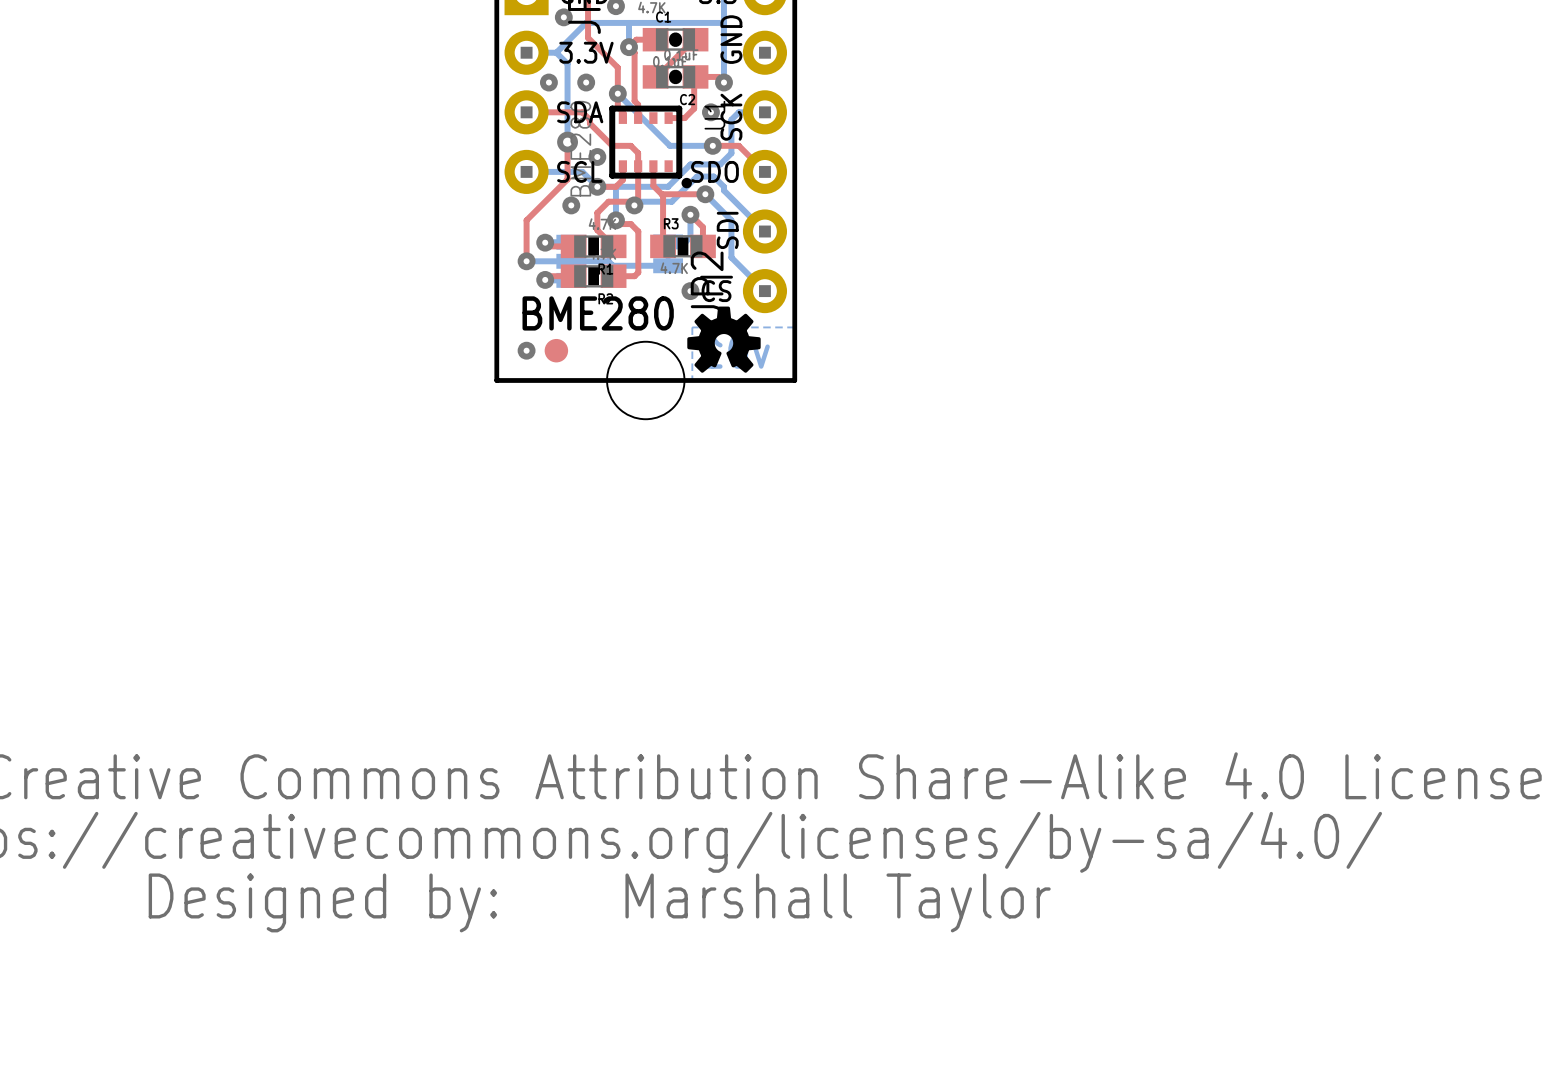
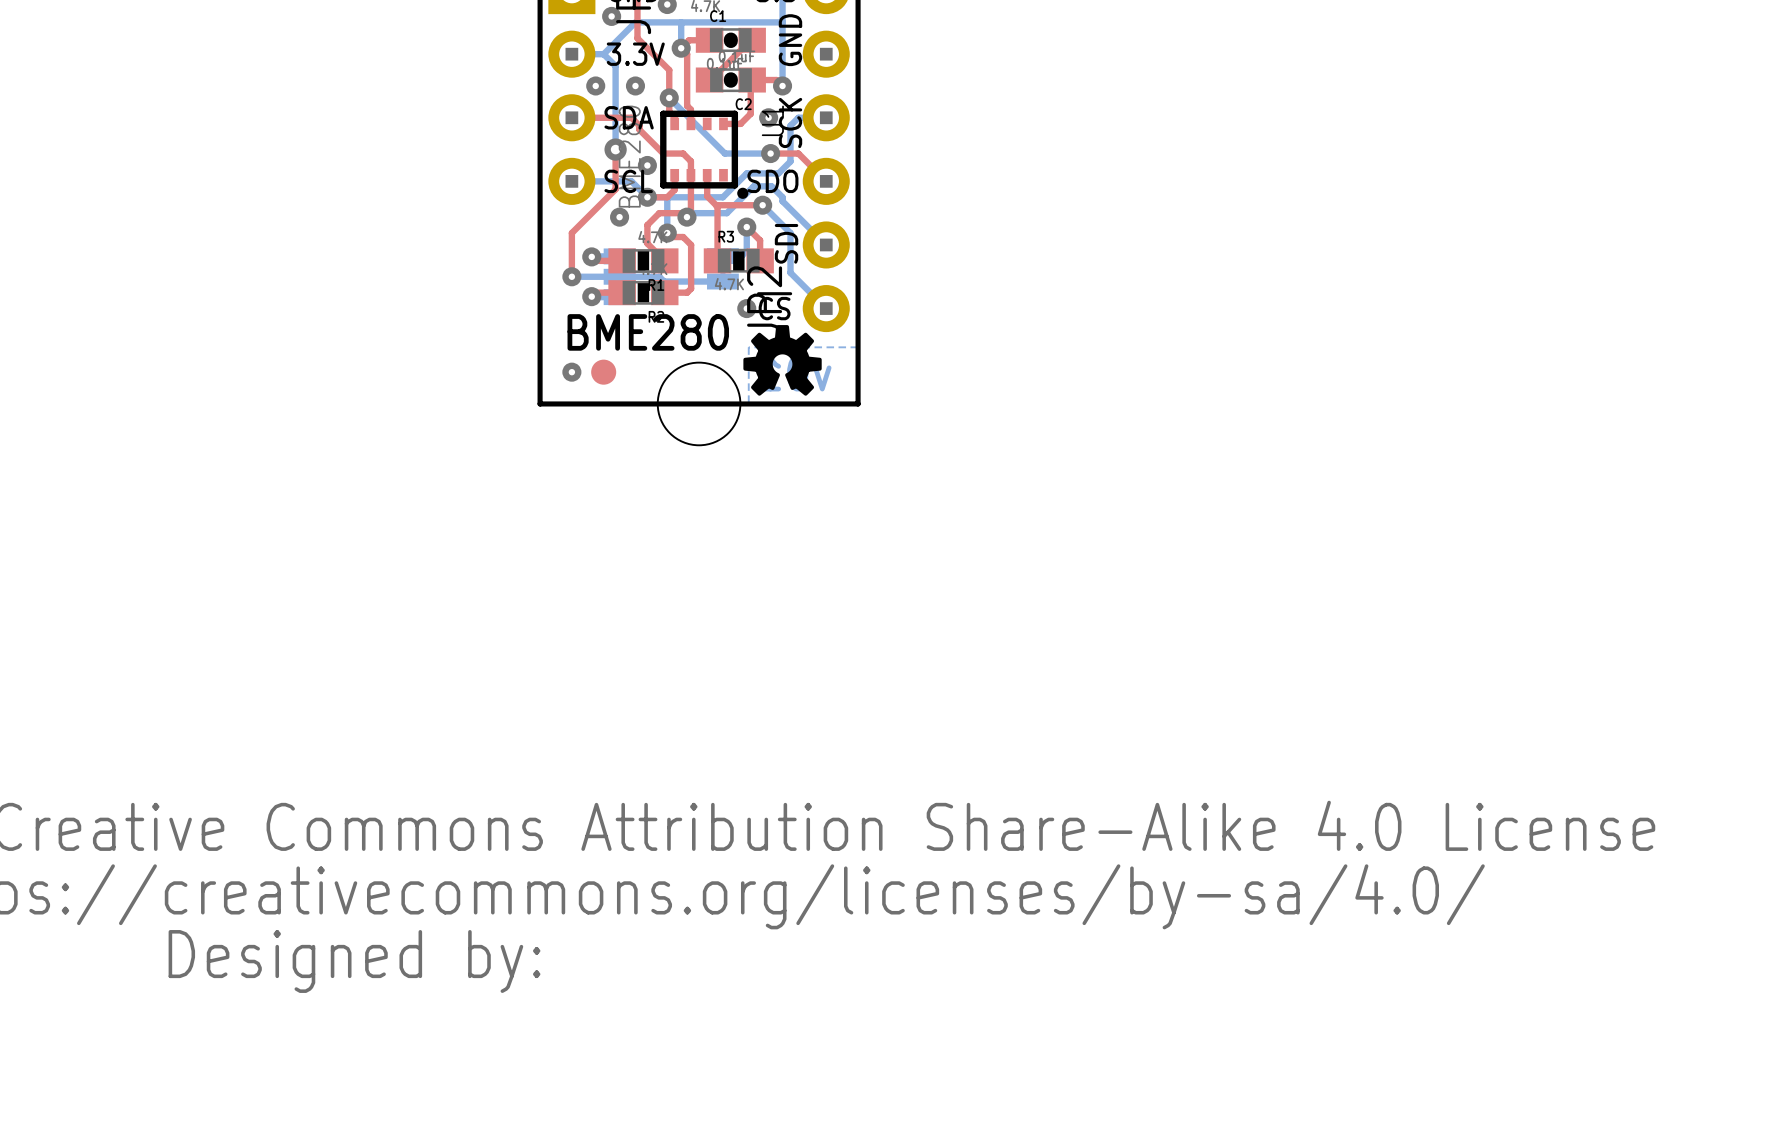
text: Marshall Taylor (838, 902) -> none

